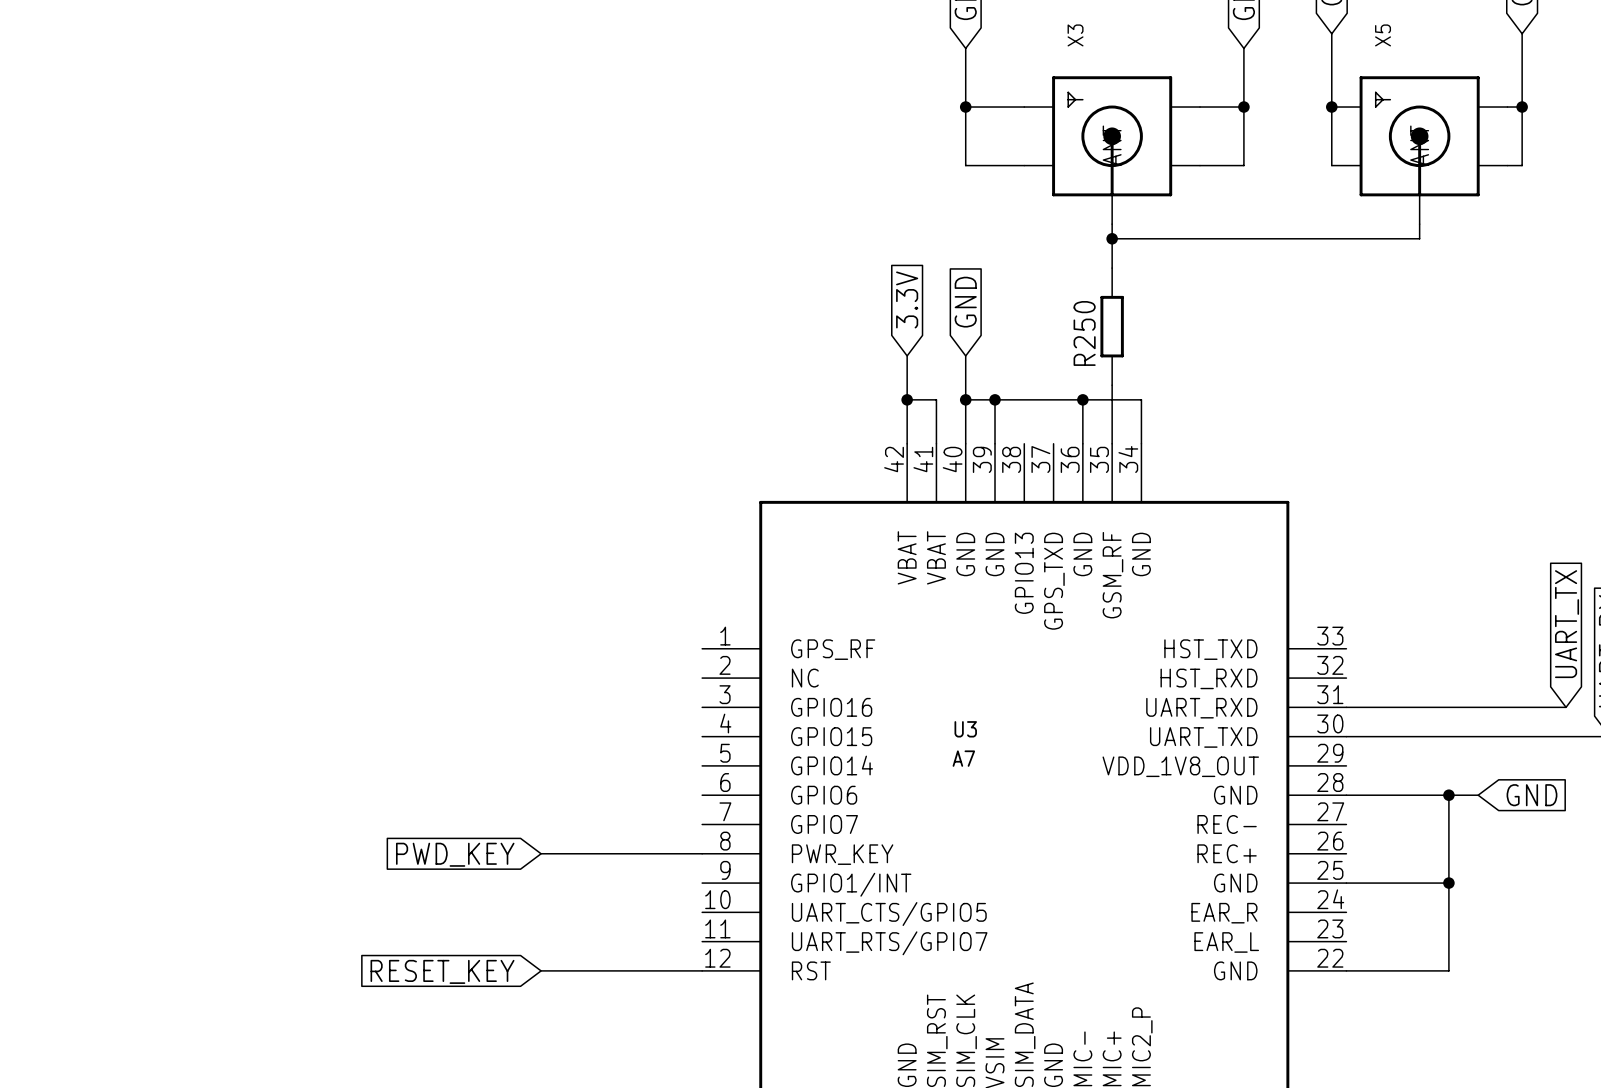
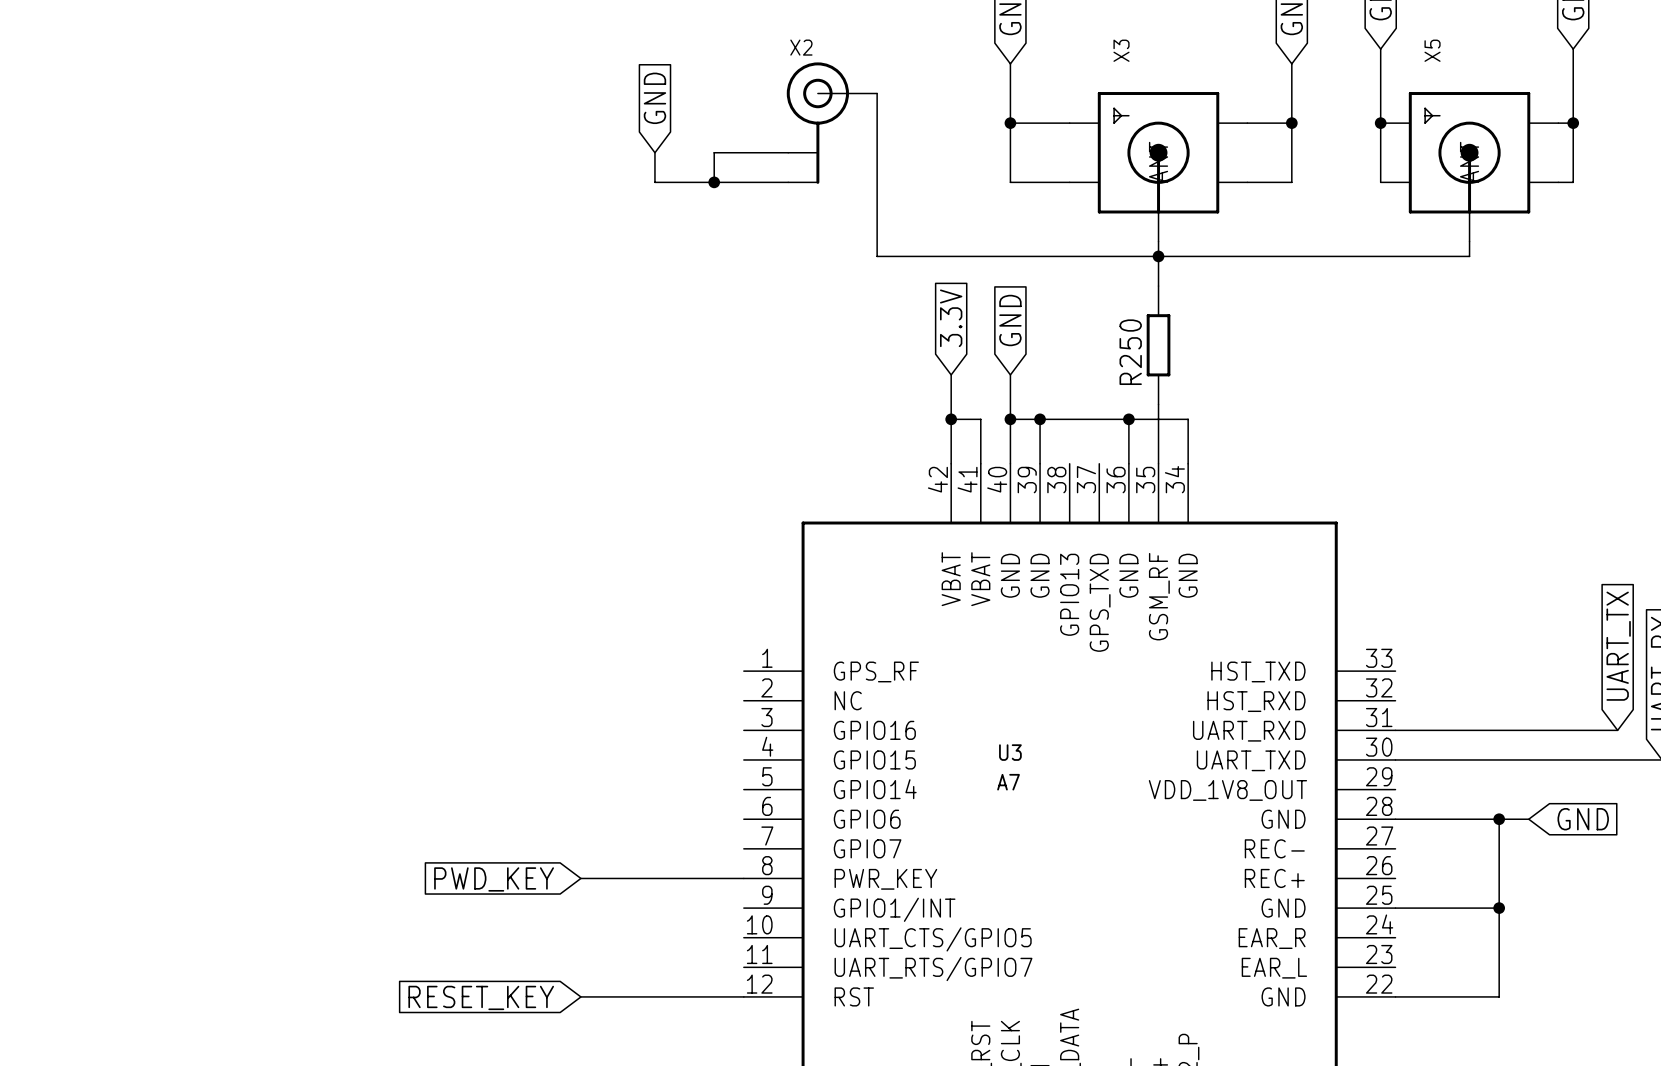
wire: none -> (877, 93) (877, 256) (1158, 256)
global label: none -> GND (654, 98)
X2: none -> (831, 123)
wire: none -> (654, 152) (654, 182) (788, 182)
wire: none -> (788, 152) (714, 152) (714, 182)
junction: none -> (714, 182)

